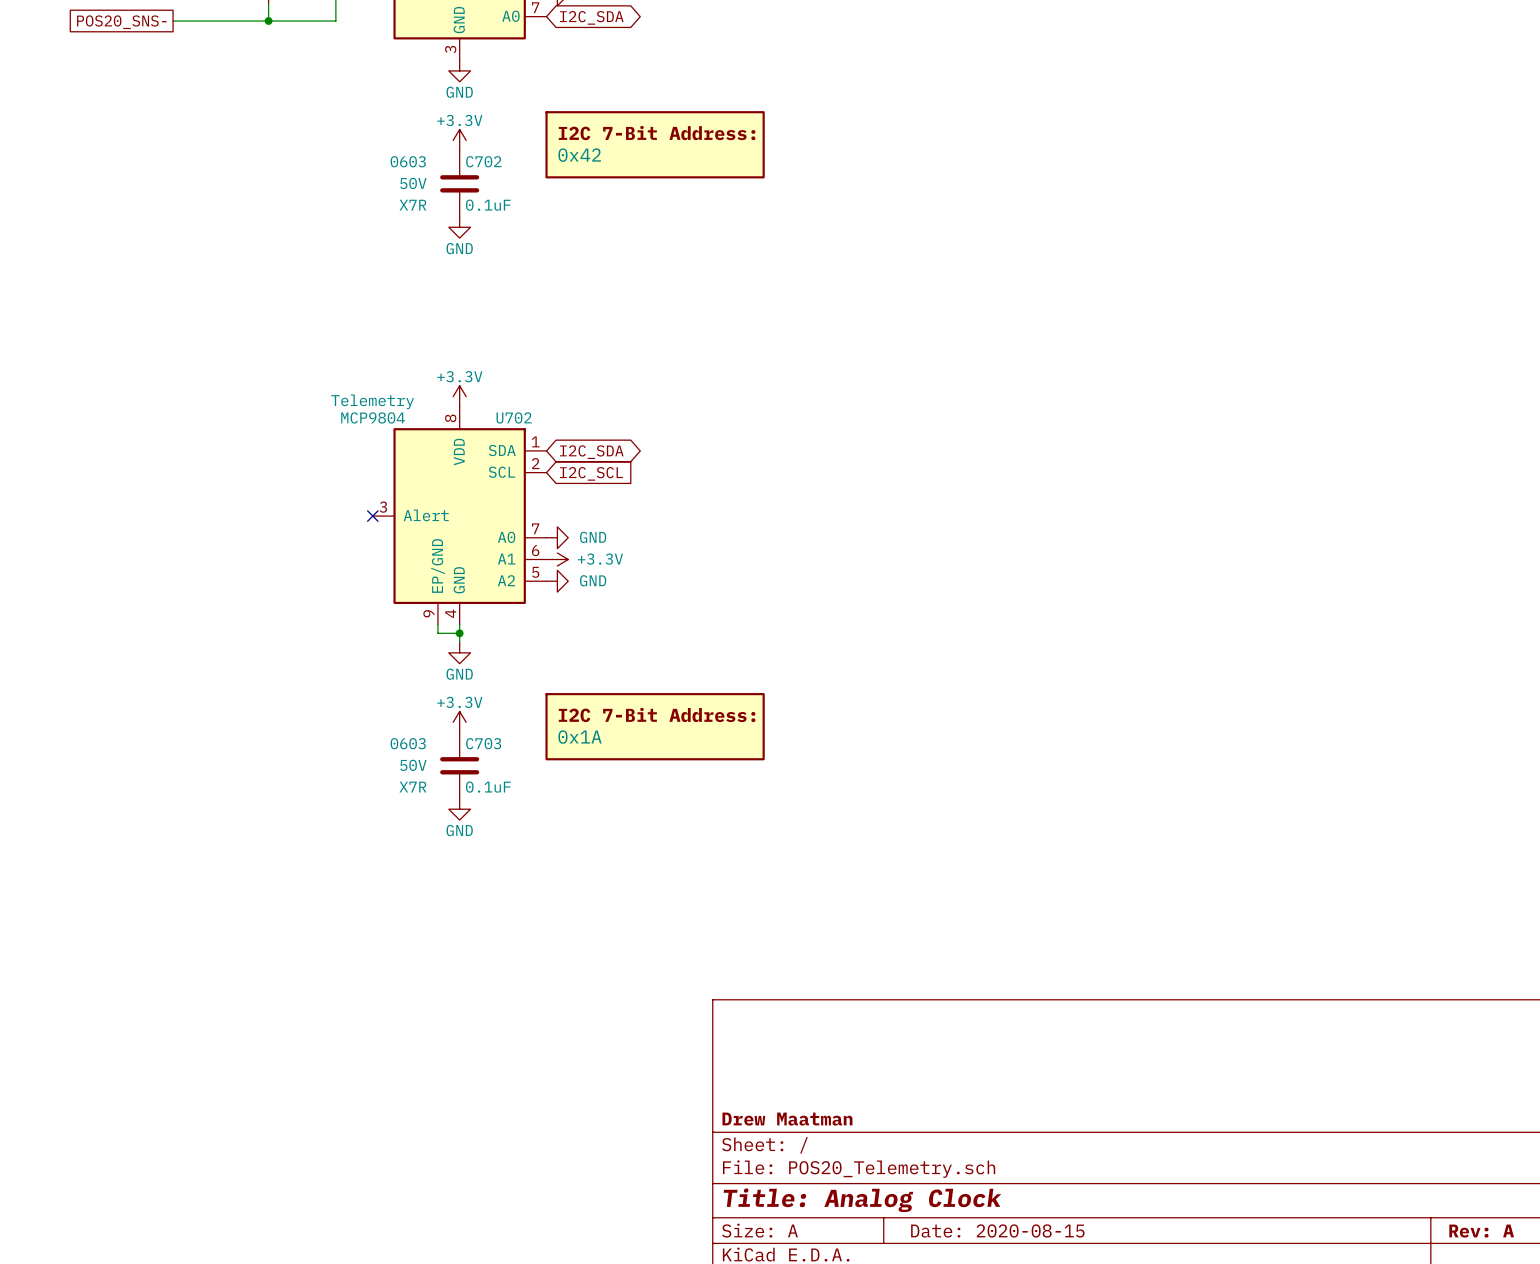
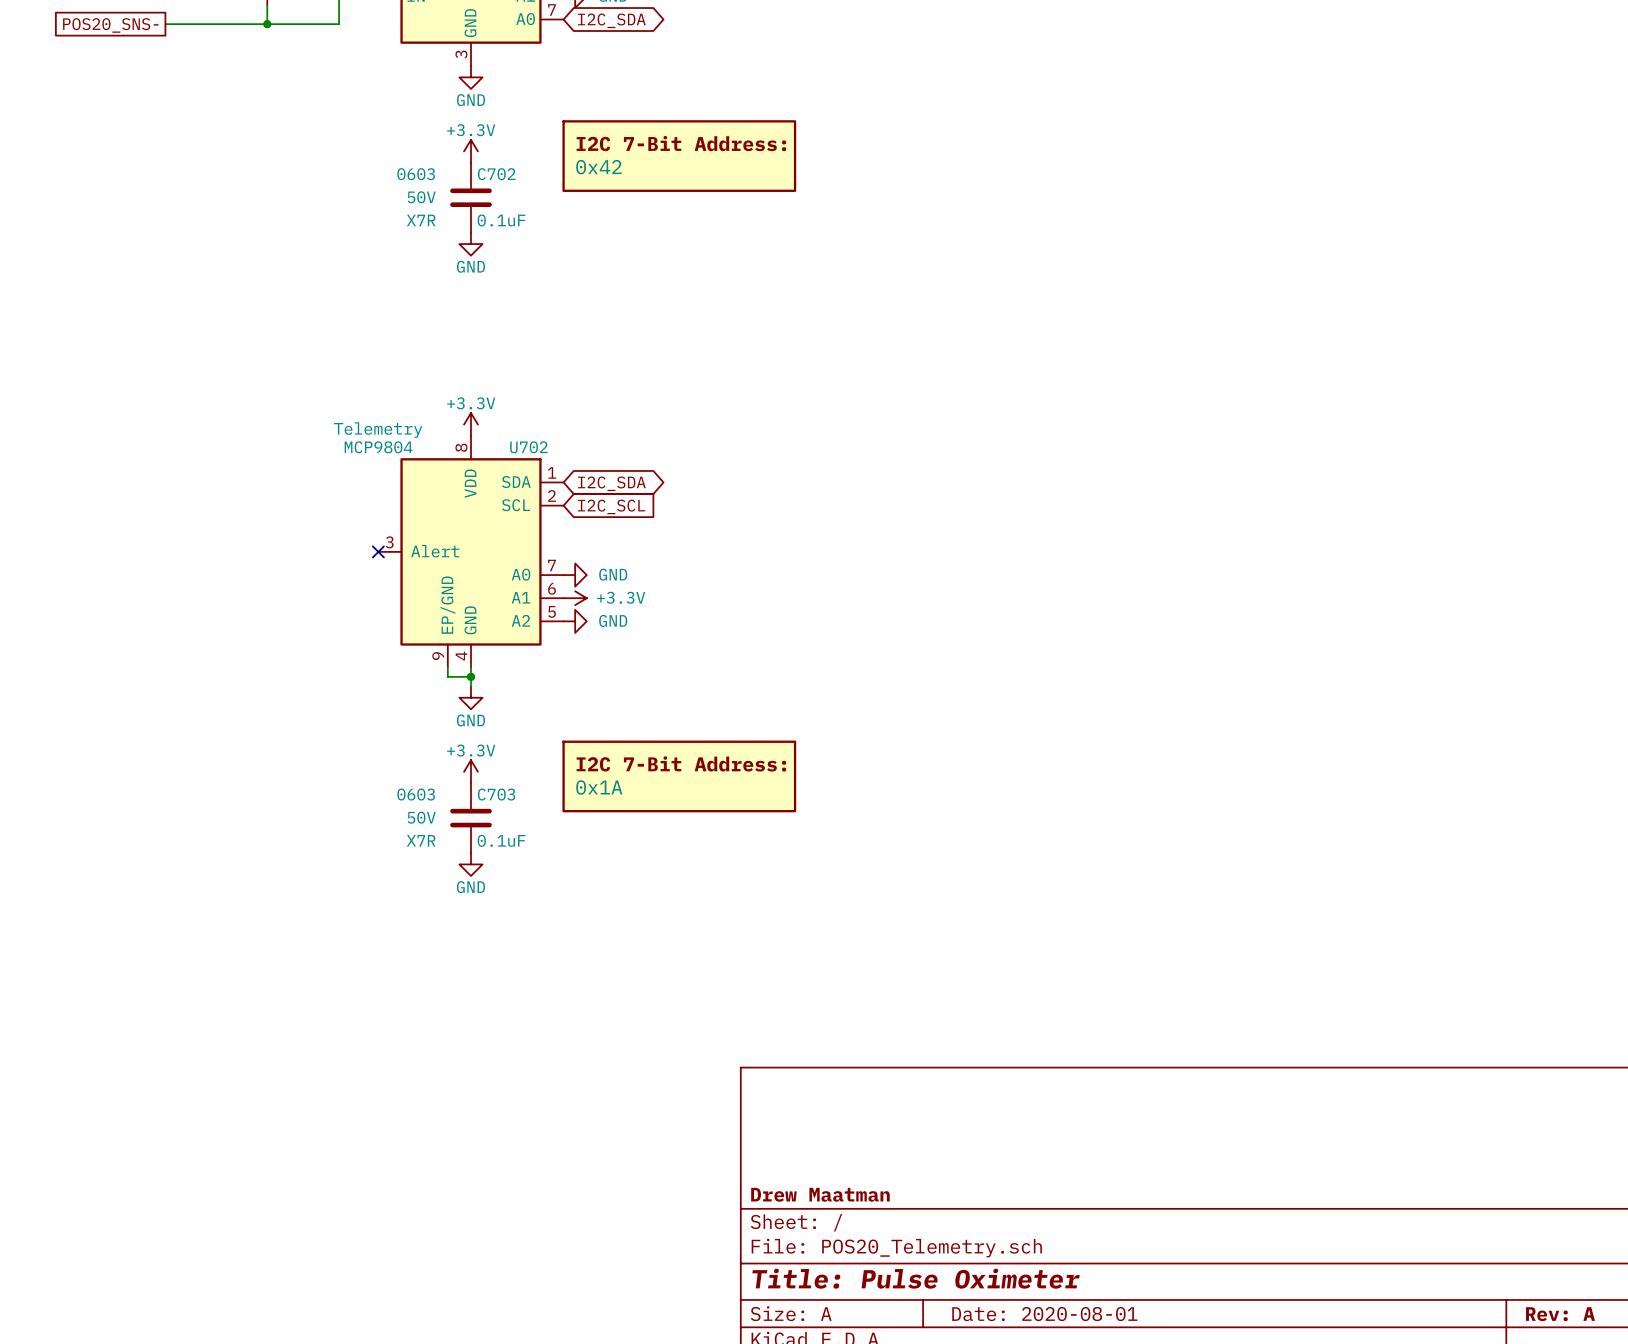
title block: Title: Analog Clock (862, 1200) -> Title: Pulse Oximeter (916, 1278)
title block: Date: 2020-08-15 (997, 1230) -> Date: 2020-08-01 (1044, 1314)

